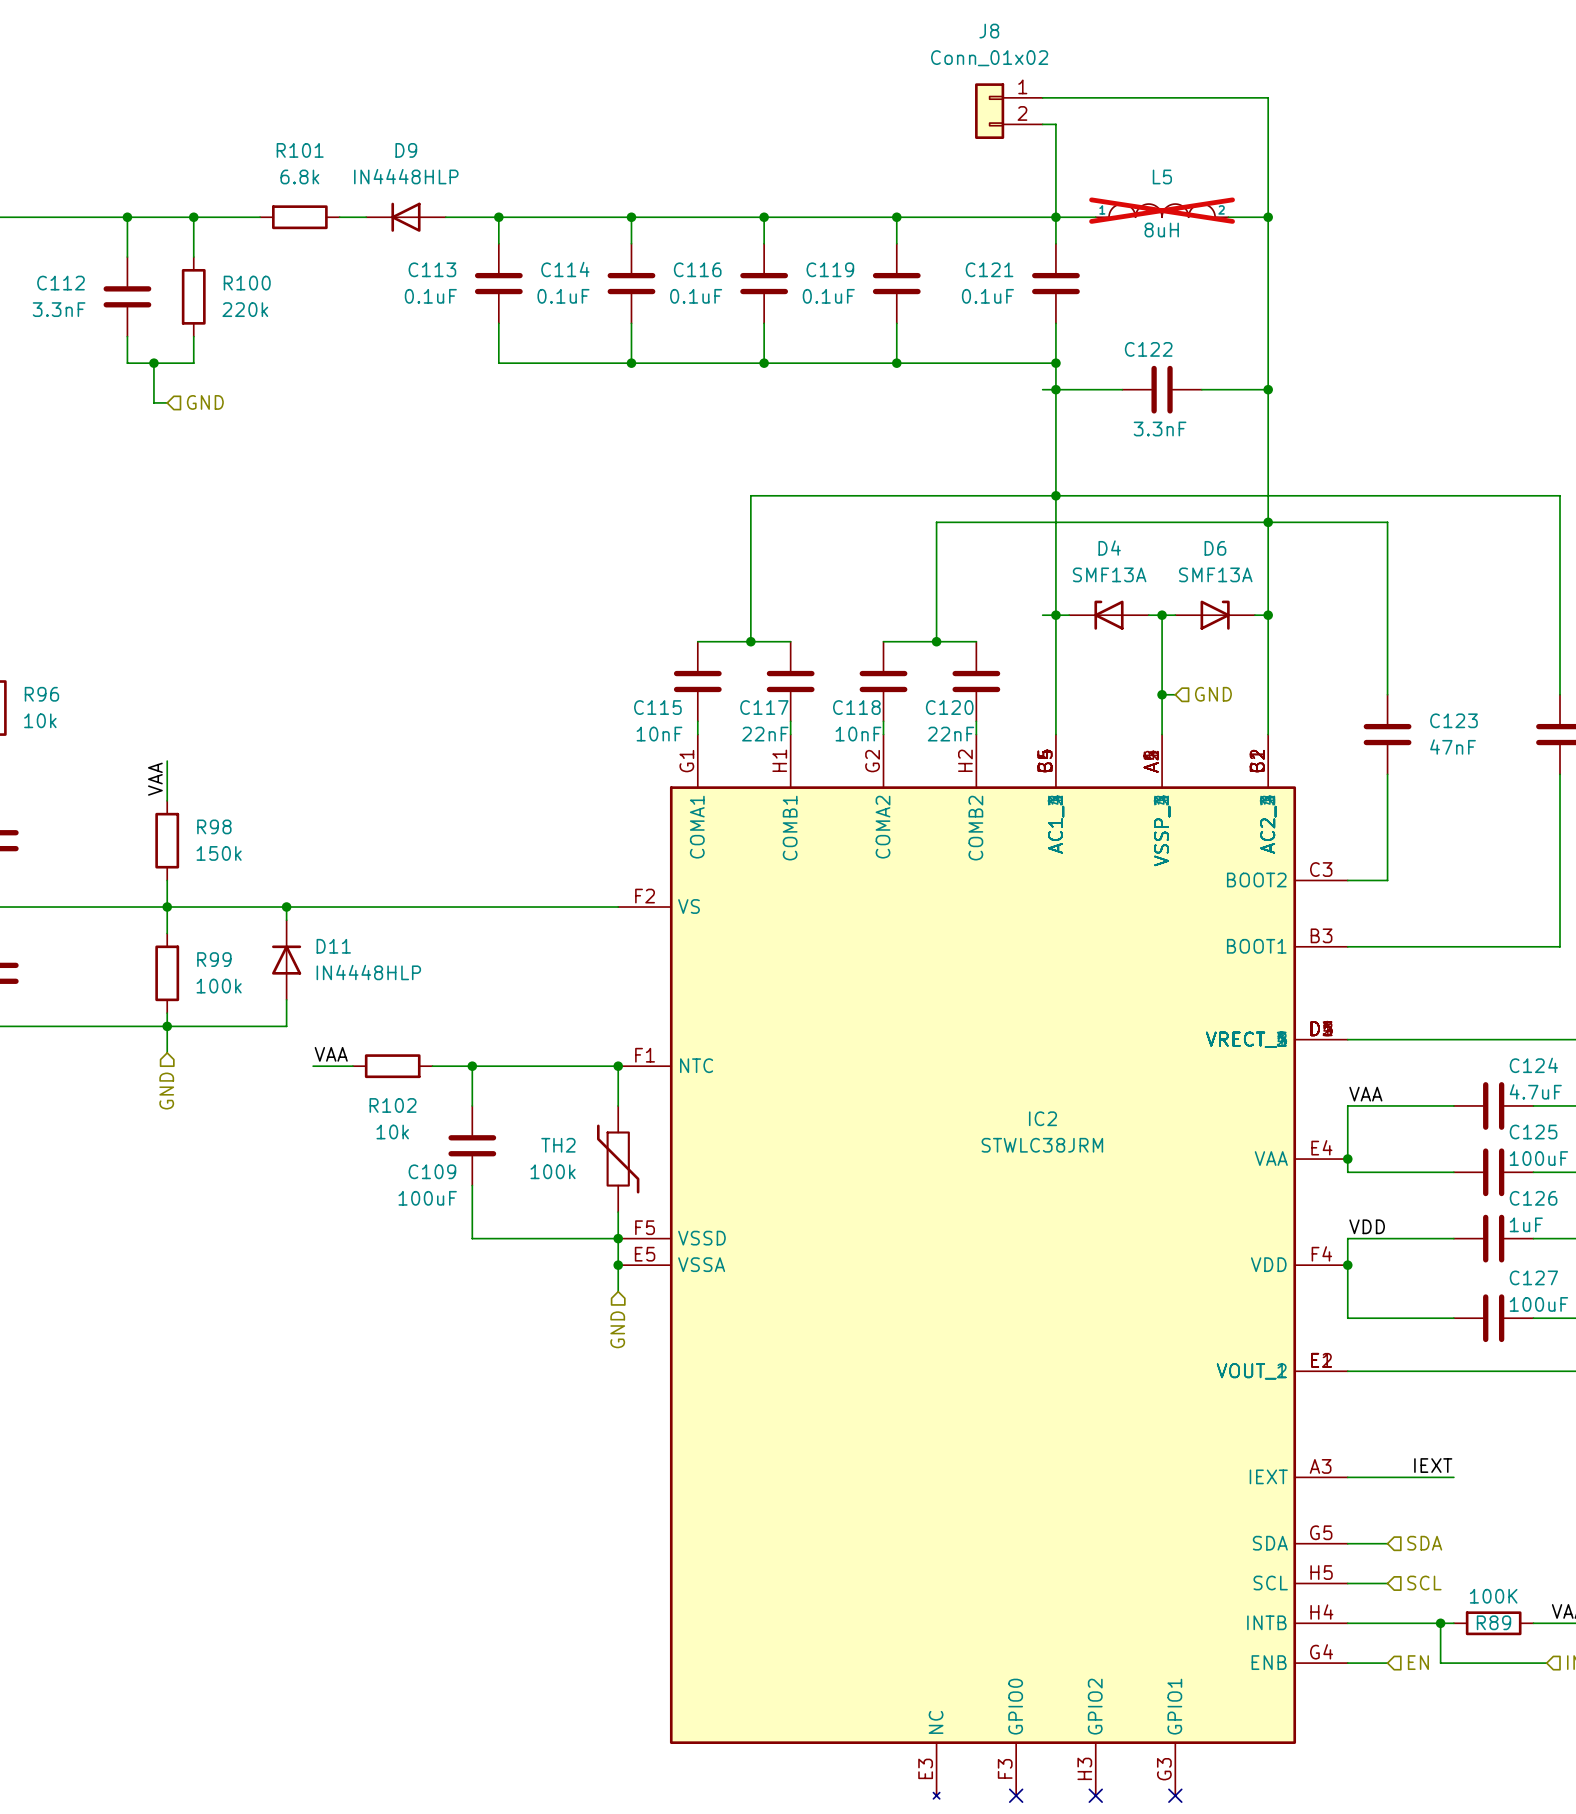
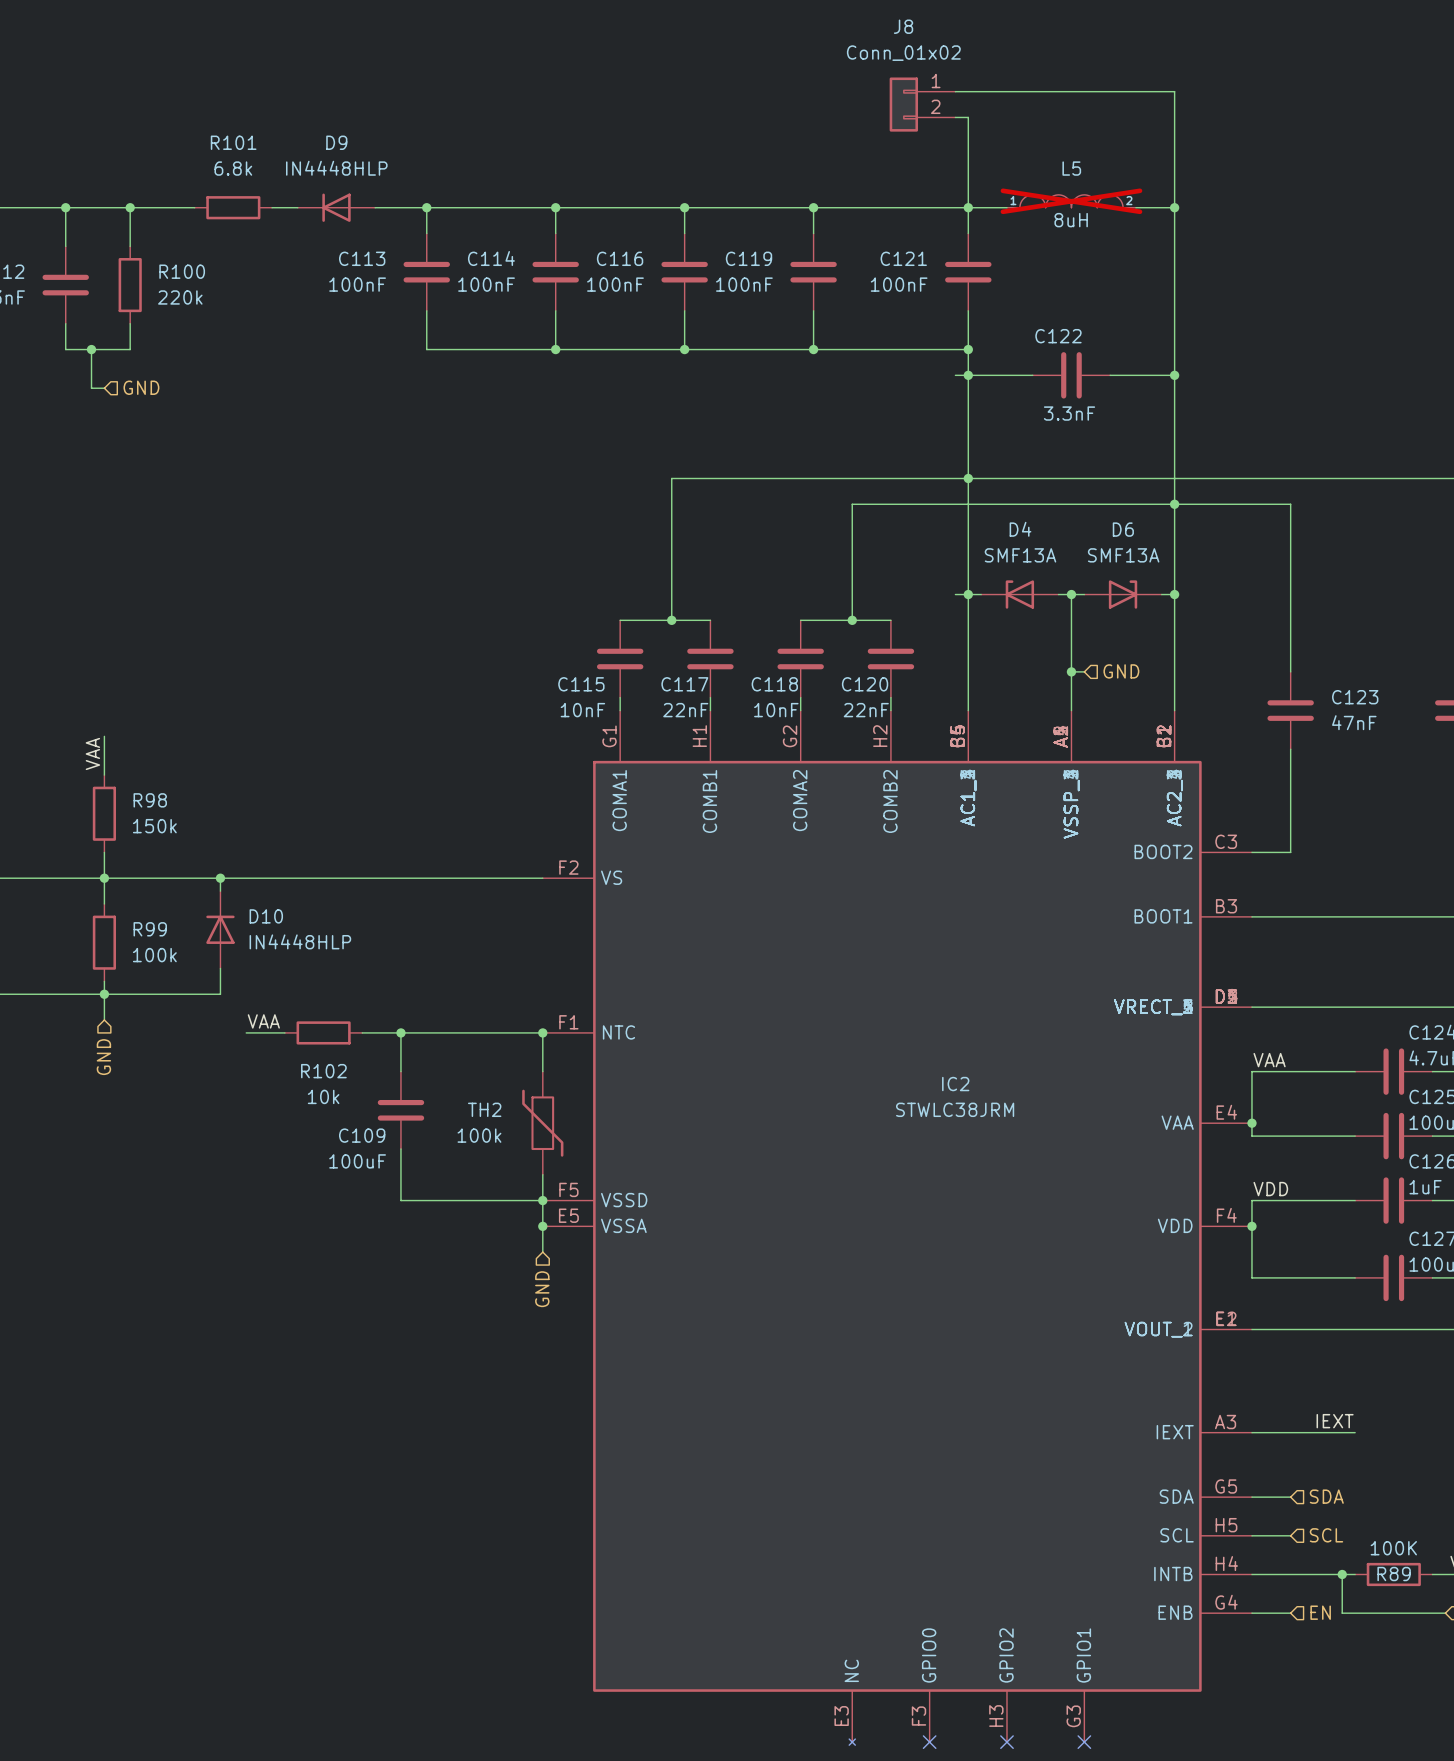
C113 value: 0.1uF (430, 296) -> 100nF (357, 284)
C114 value: 0.1uF (563, 296) -> 100nF (486, 284)
C116 value: 0.1uF (696, 296) -> 100nF (615, 284)
C119 value: 0.1uF (828, 296) -> 100nF (744, 284)
C121 value: 0.1uF (987, 296) -> 100nF (899, 284)
D11 name: D11 (333, 946) -> D10 (266, 916)

